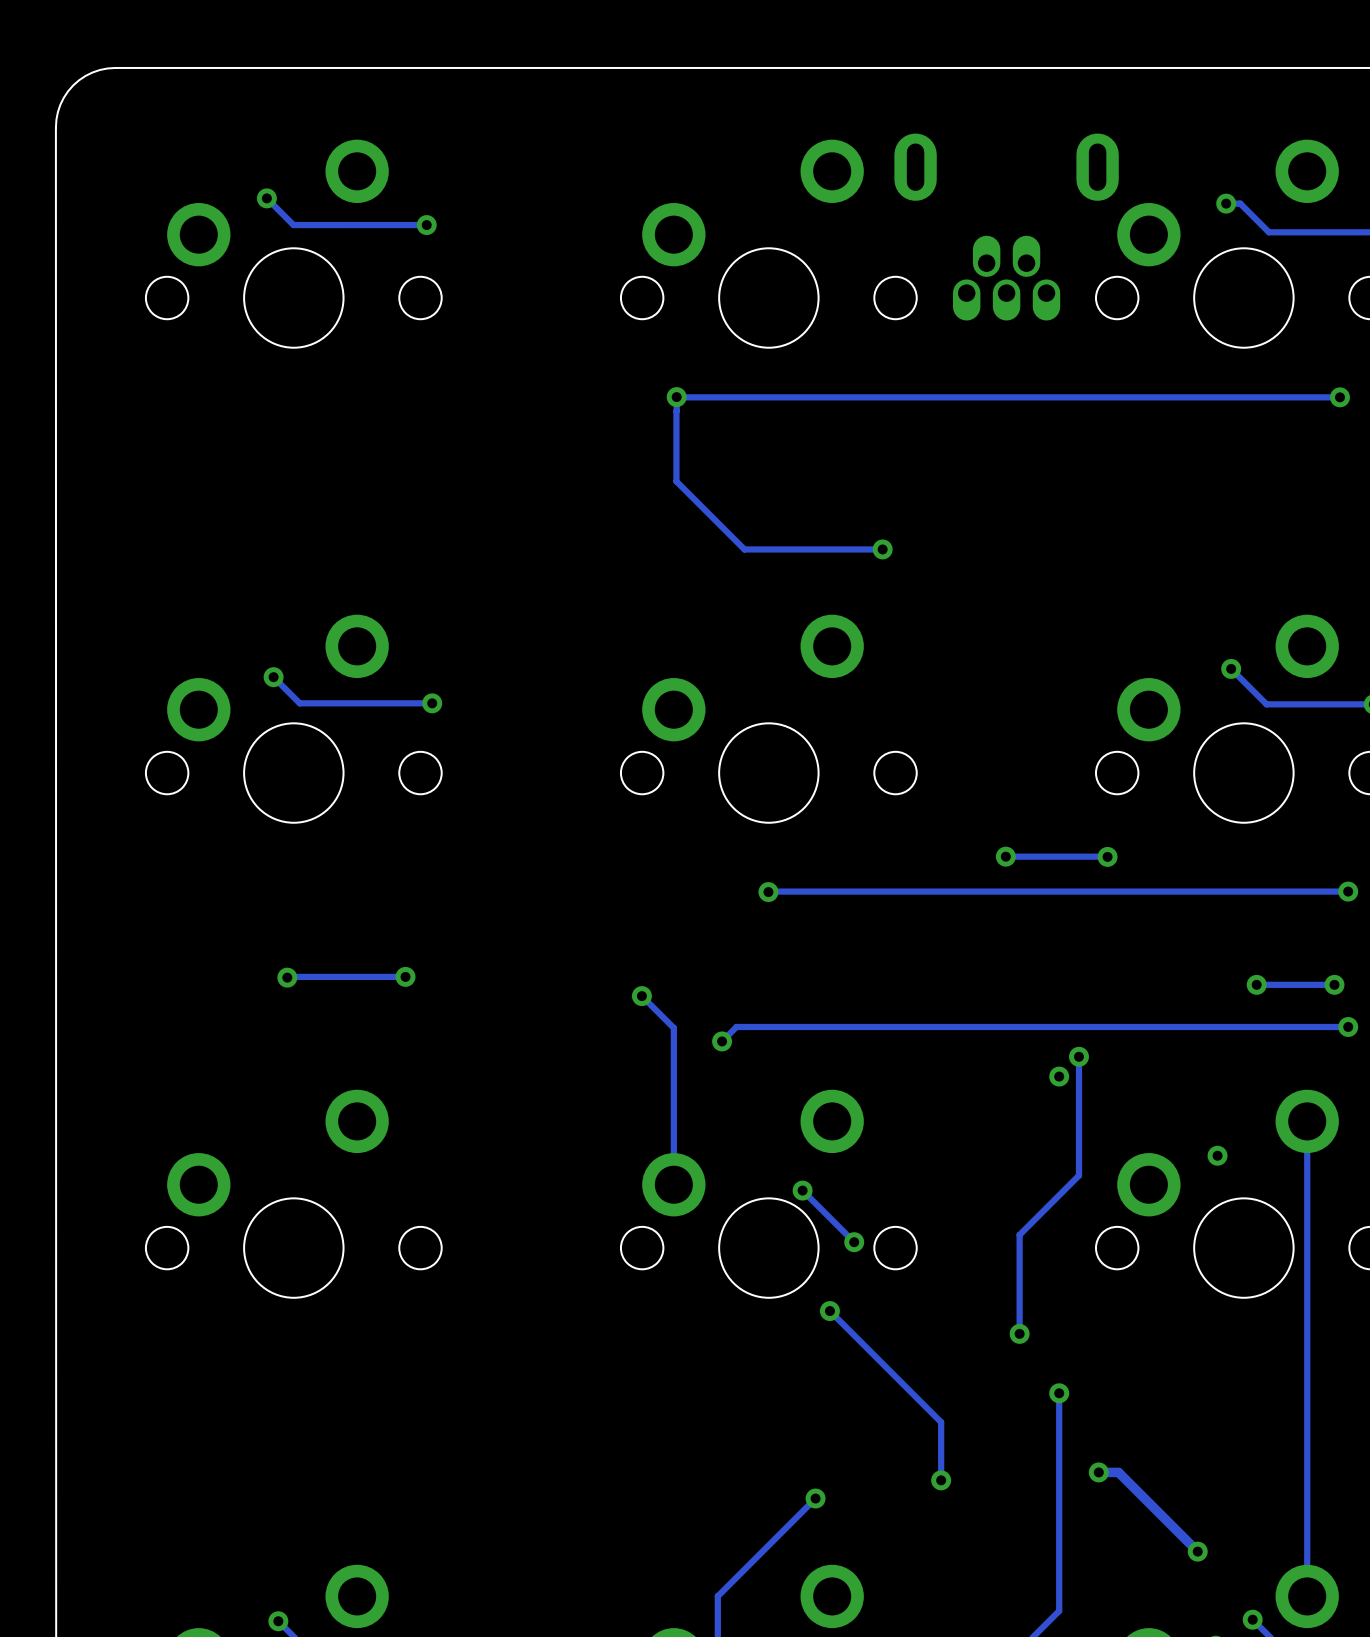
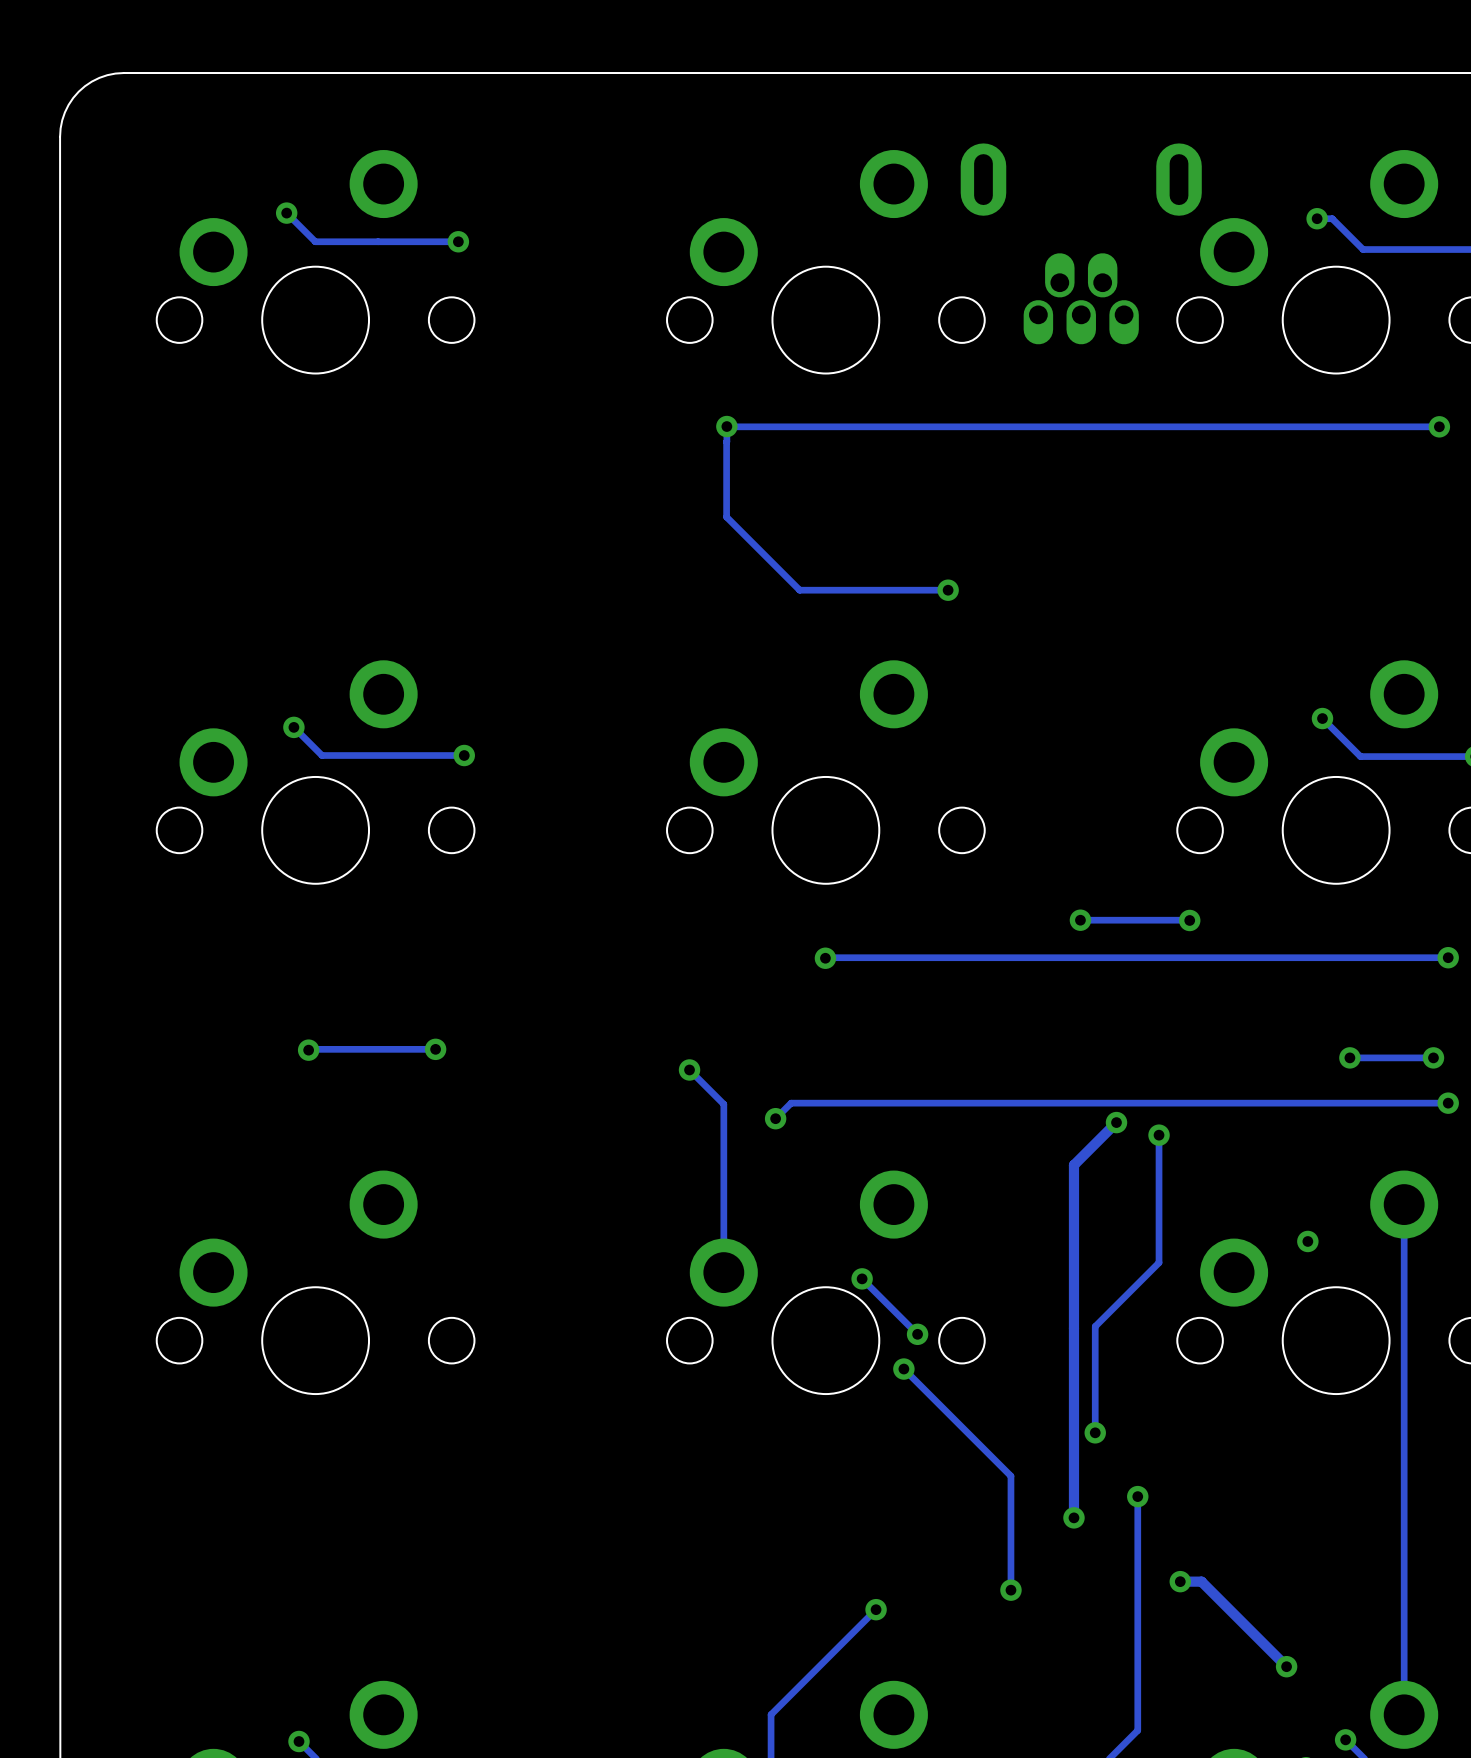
track: none -> (1116, 1122) (1073, 1165) (1073, 1517)
via position: (1059, 1076) -> (1116, 1122)
track: (829, 1311) (941, 1422) -> (903, 1369) (1010, 1476) (1010, 1527)
via position: (829, 1311) -> (903, 1369)
via: none -> (1073, 1517)

